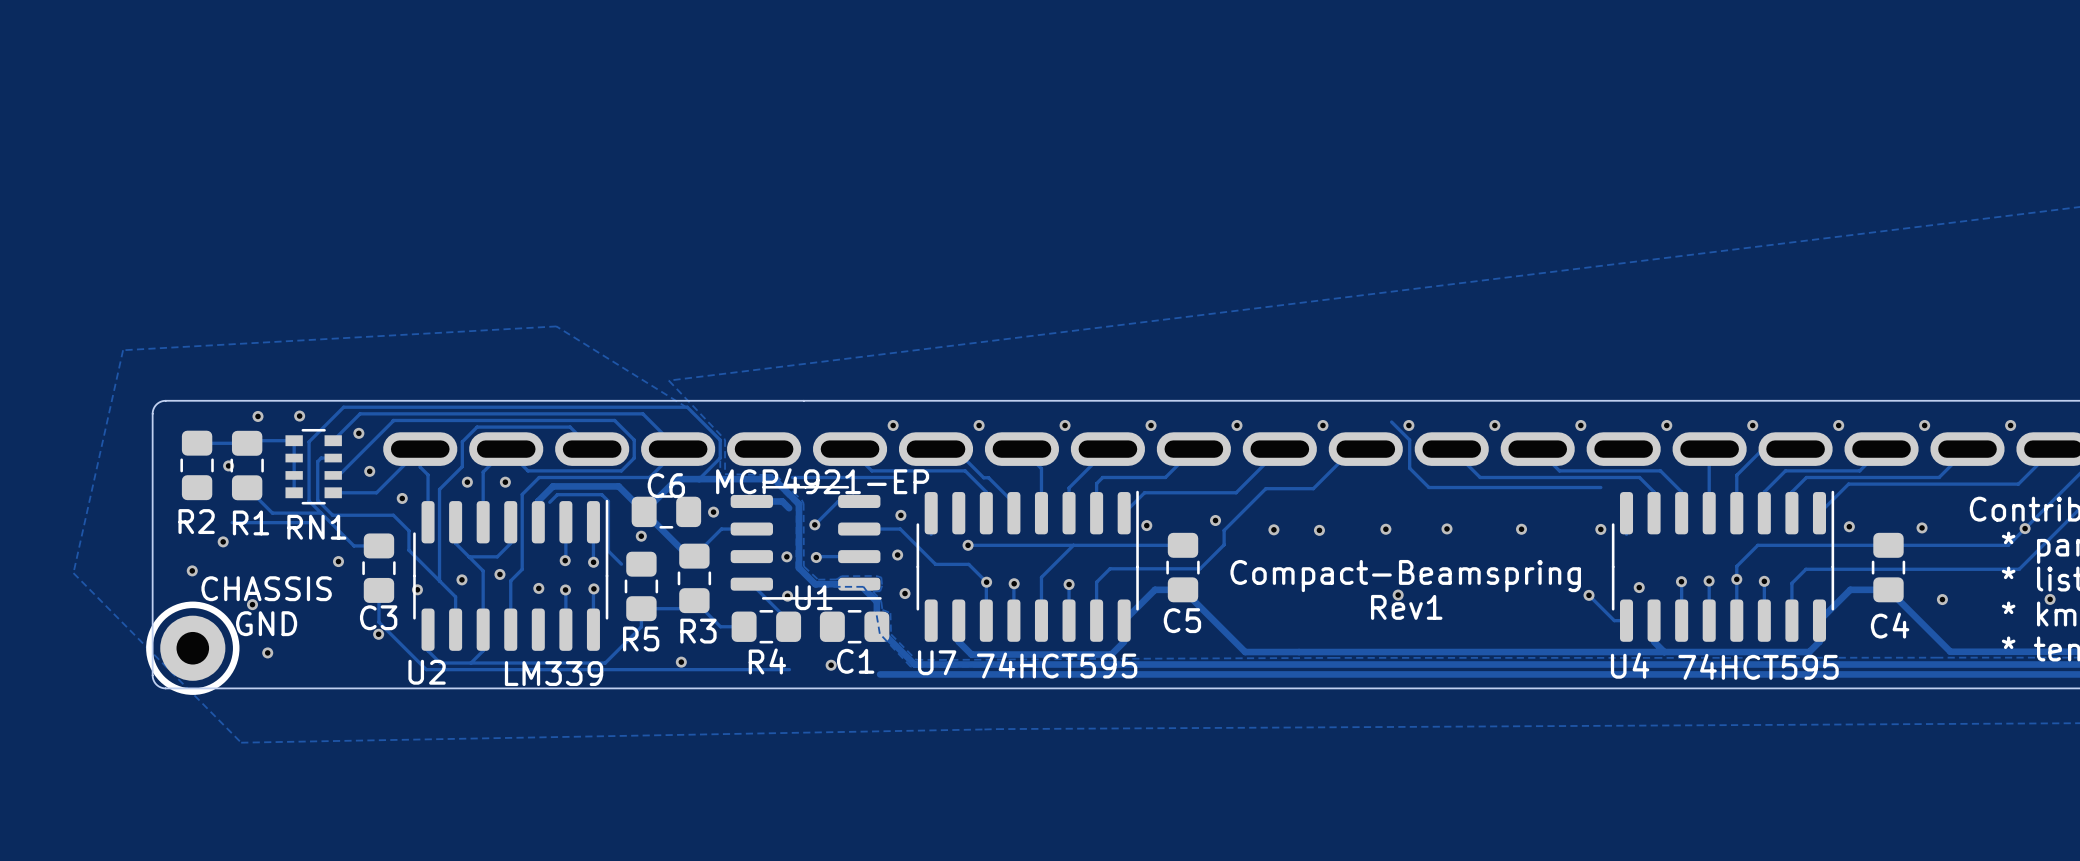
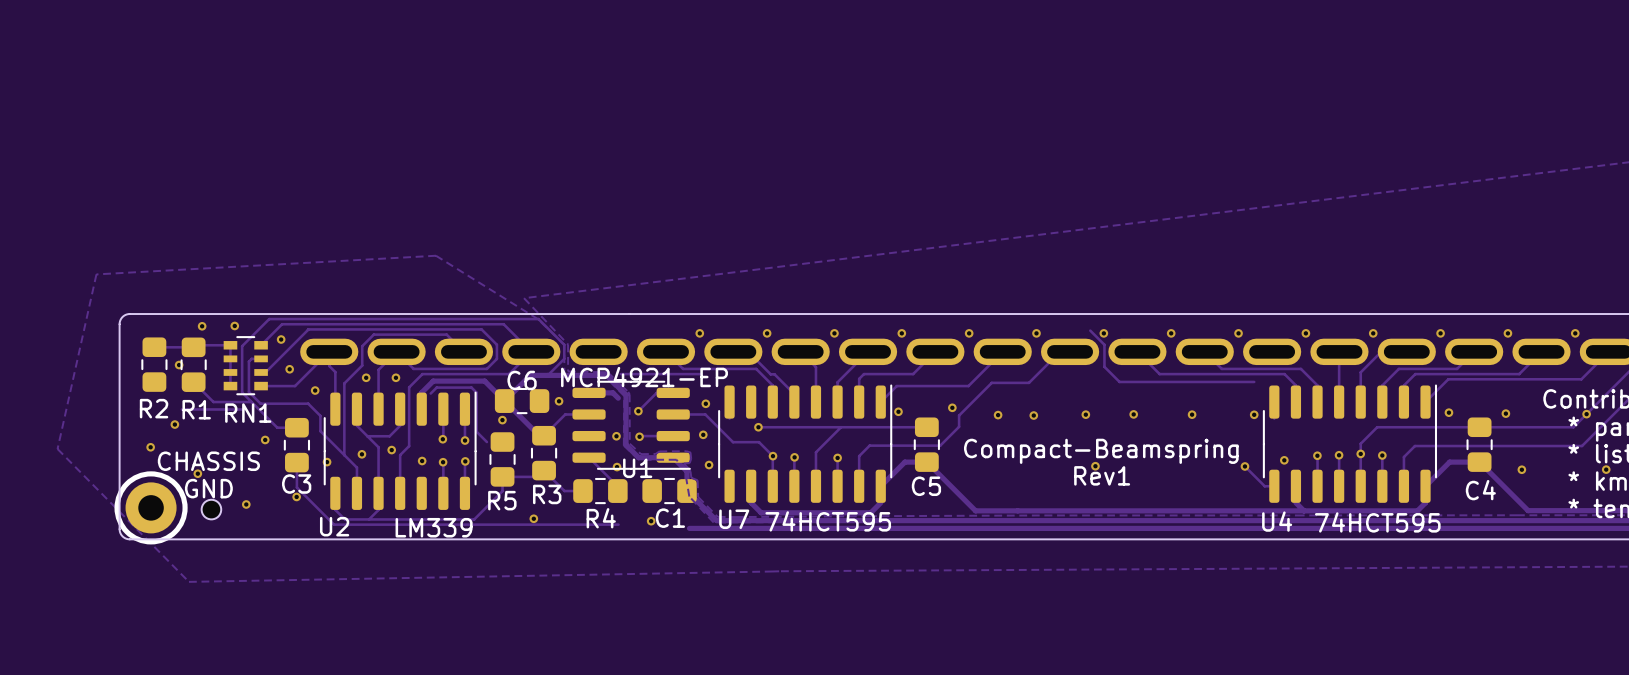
part: none -> (211, 509)
via position: (267, 652) -> (246, 504)

